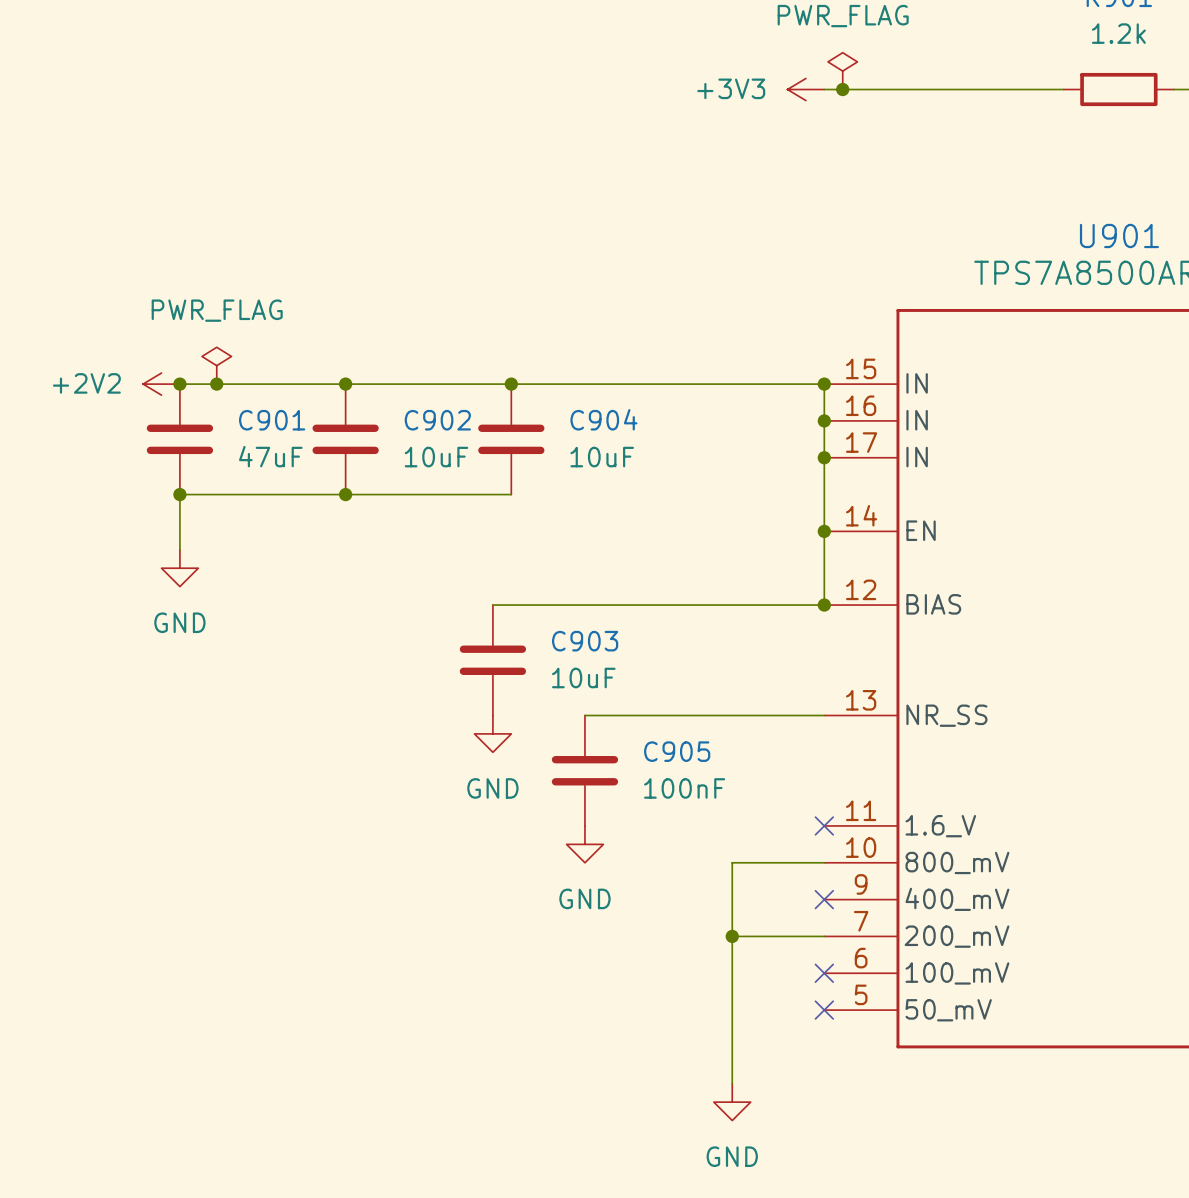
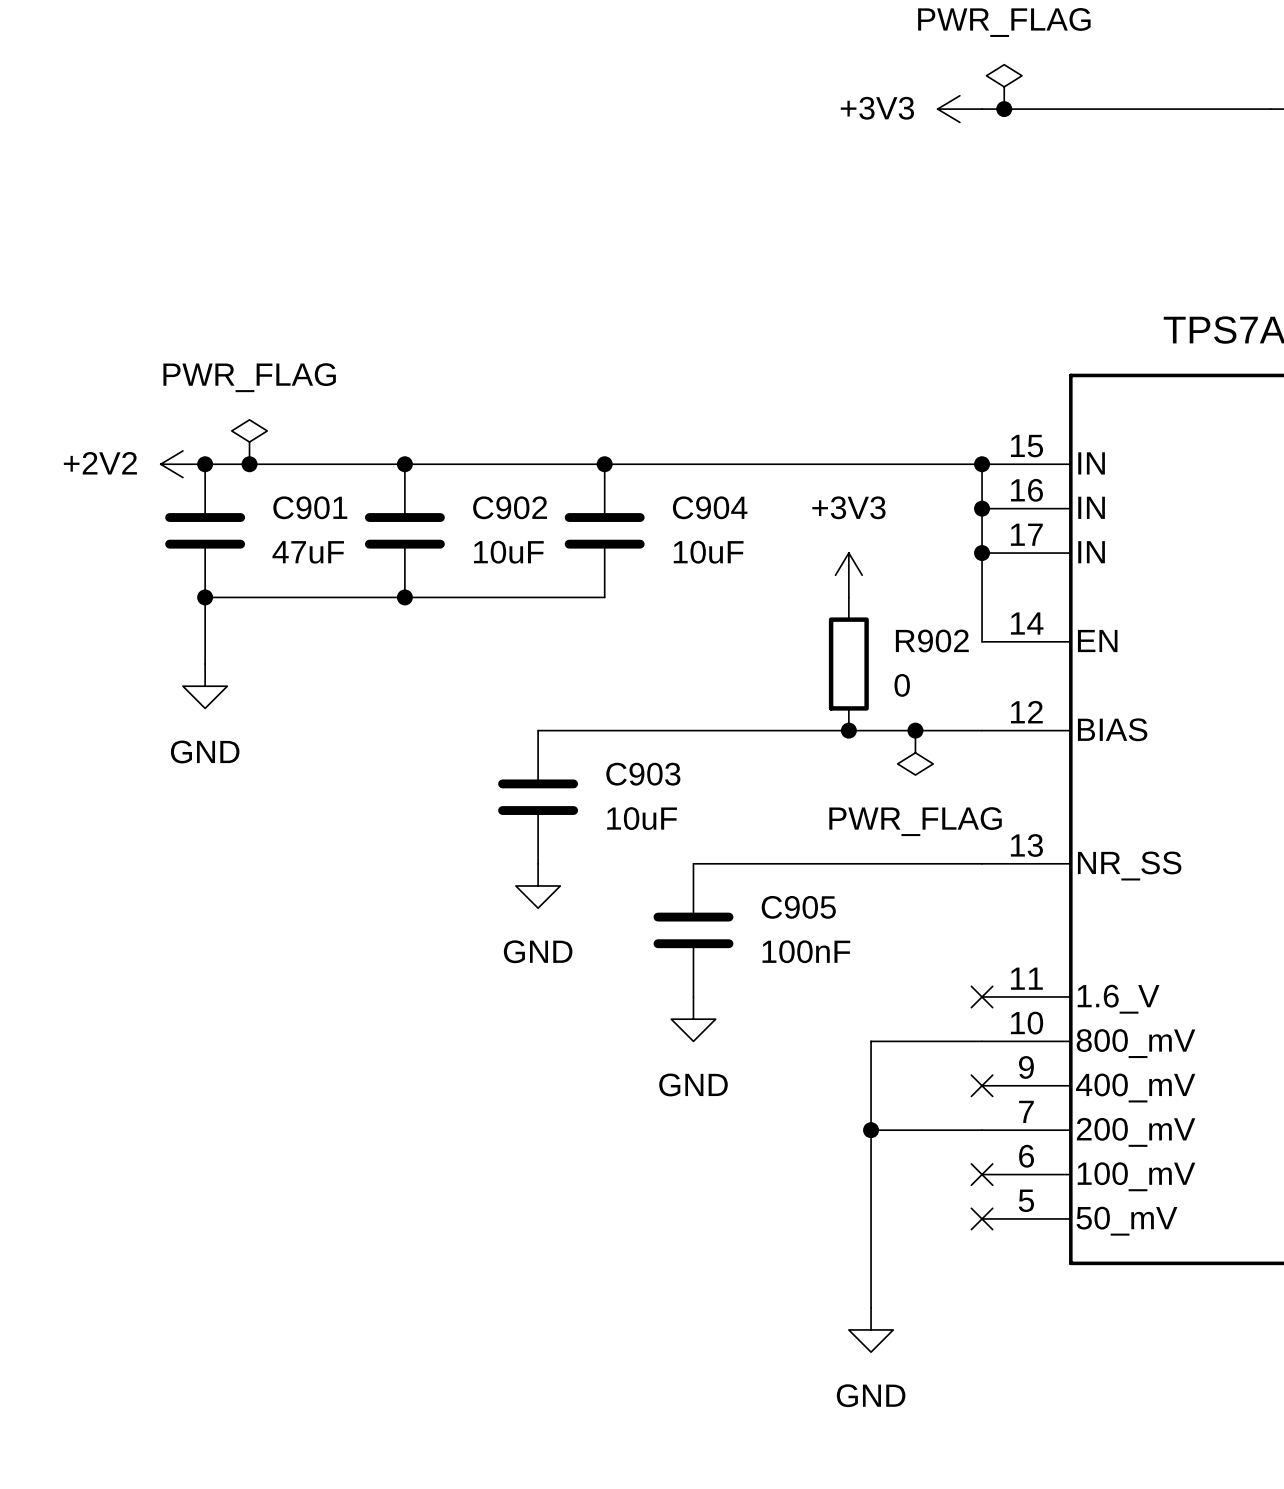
power symbol: none -> +3V3 (848, 575)
wire: (824, 531) (824, 605) -> none
junction: (824, 531) -> none
R902: none -> 0 (848, 664)
wire: none -> (538, 730) (582, 730)
junction: none -> (848, 730)
junction: none -> (915, 730)
junction: (824, 605) -> none
power symbol: none -> PWR_FLAG (915, 752)
C903 position: (492, 660) -> (538, 797)
power symbol position: GND (492, 733) -> GND (538, 886)

